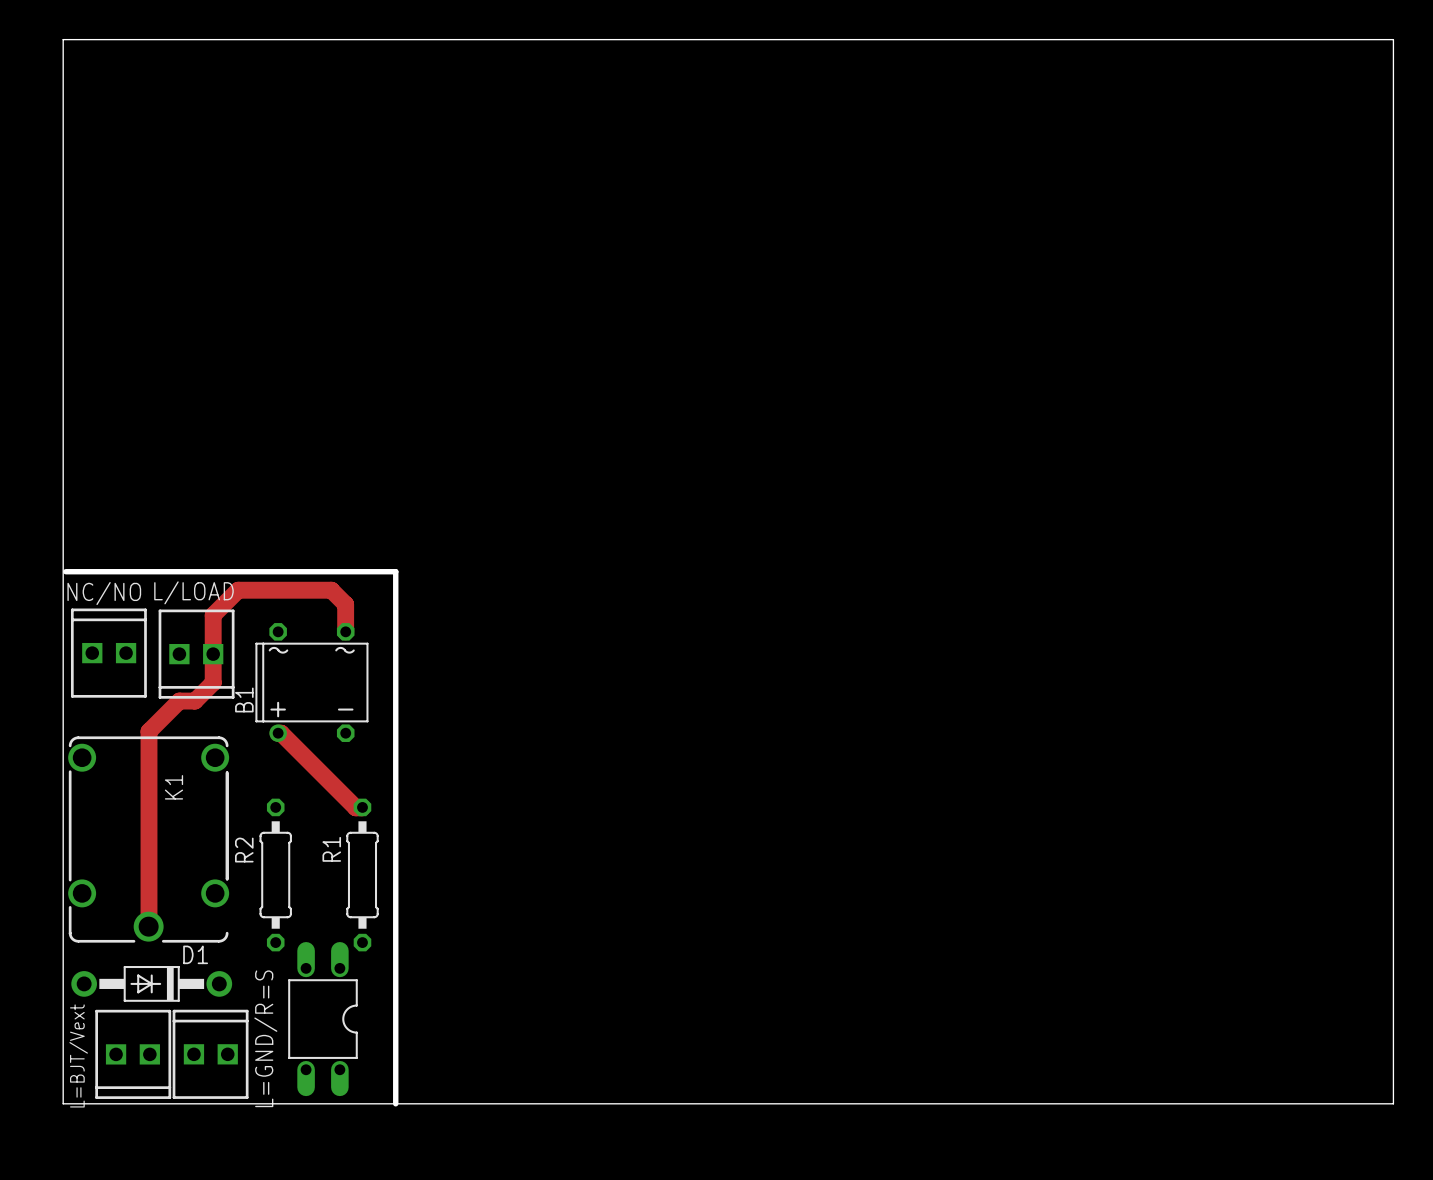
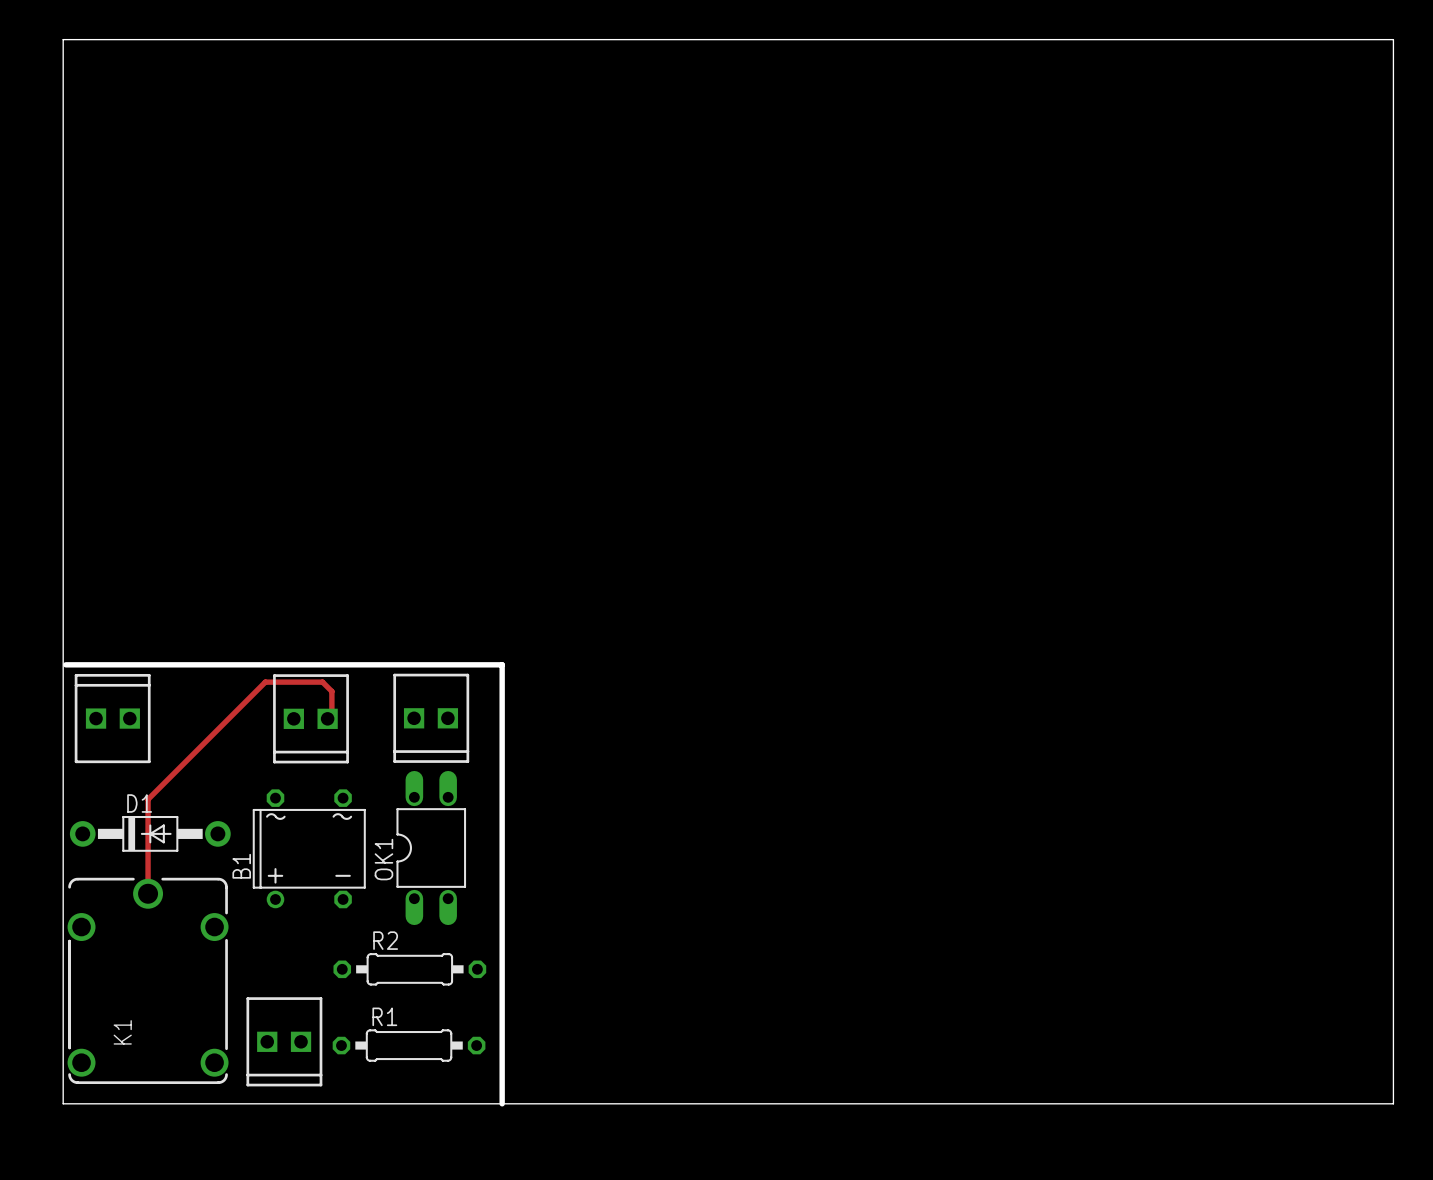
board edge: (65, 571) (395, 571) (395, 1103) -> none
text: L/LOAD (193, 592) -> none
text: NC/NO (104, 593) -> none
track: (345, 631) (345, 604) (331, 590) (238, 590) (213, 615) (213, 682) (194, 701) (179, 701) (149, 731) (148, 926) -> none
part: (108, 653) -> none
part: (196, 654) -> none
board edge: none -> (65, 664) (502, 664) (502, 1103)
B1 position: (311, 682) -> (309, 848)
part: none -> (112, 718)
part: none -> (311, 718)
track: none -> (327, 718) (331, 714) (331, 691) (322, 682) (265, 682) (148, 799) (148, 893)
part: none -> (431, 718)
track: (278, 733) (281, 733) (355, 807) (362, 807) -> none
K1 rotation: 0° (148, 839) -> 180° (148, 980)
K1 position: (148, 839) -> (148, 980)
OK1: none -> (431, 848)
R2 rotation: 0° (275, 875) -> 90° clockwise (409, 969)
R2 position: (275, 875) -> (409, 969)
R1 rotation: 0° (362, 875) -> 90° clockwise (409, 1045)
R1 position: (362, 875) -> (409, 1045)
D1 name position: D1 (195, 954) -> D1 (139, 803)
D1 rotation: 0° (151, 983) -> 180° (150, 833)
D1 position: (151, 983) -> (150, 833)
part: (322, 1019) -> none
text: L=GND/R=S (265, 1038) -> none
part: (133, 1054) -> none
part rotation: 0° (210, 1054) -> 180° (284, 1041)
part position: (210, 1054) -> (284, 1041)
text: L=BJT/Vext (78, 1055) -> none

